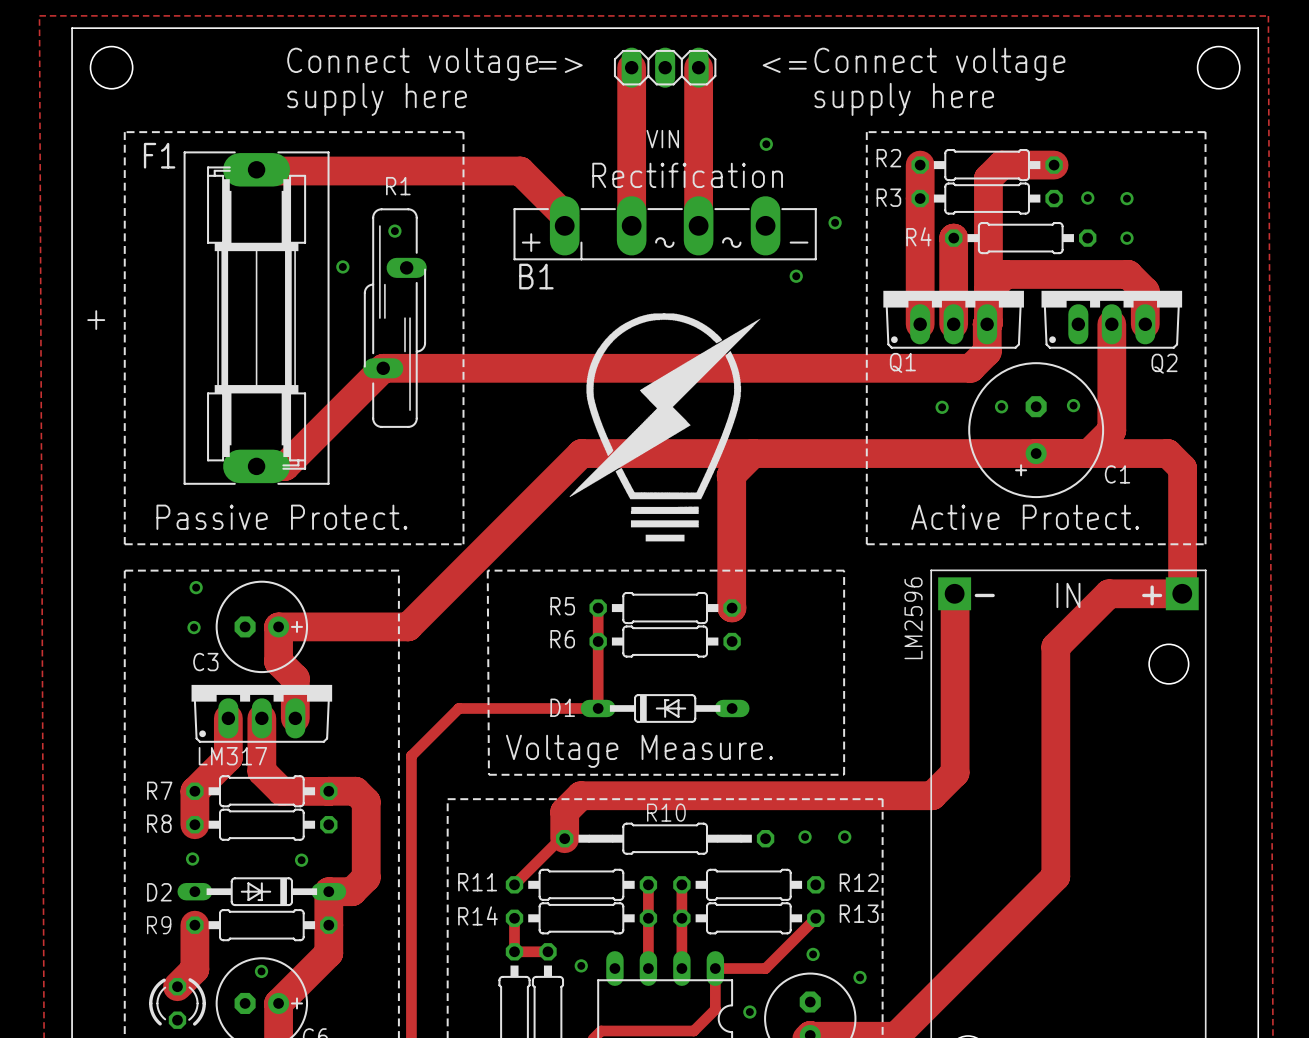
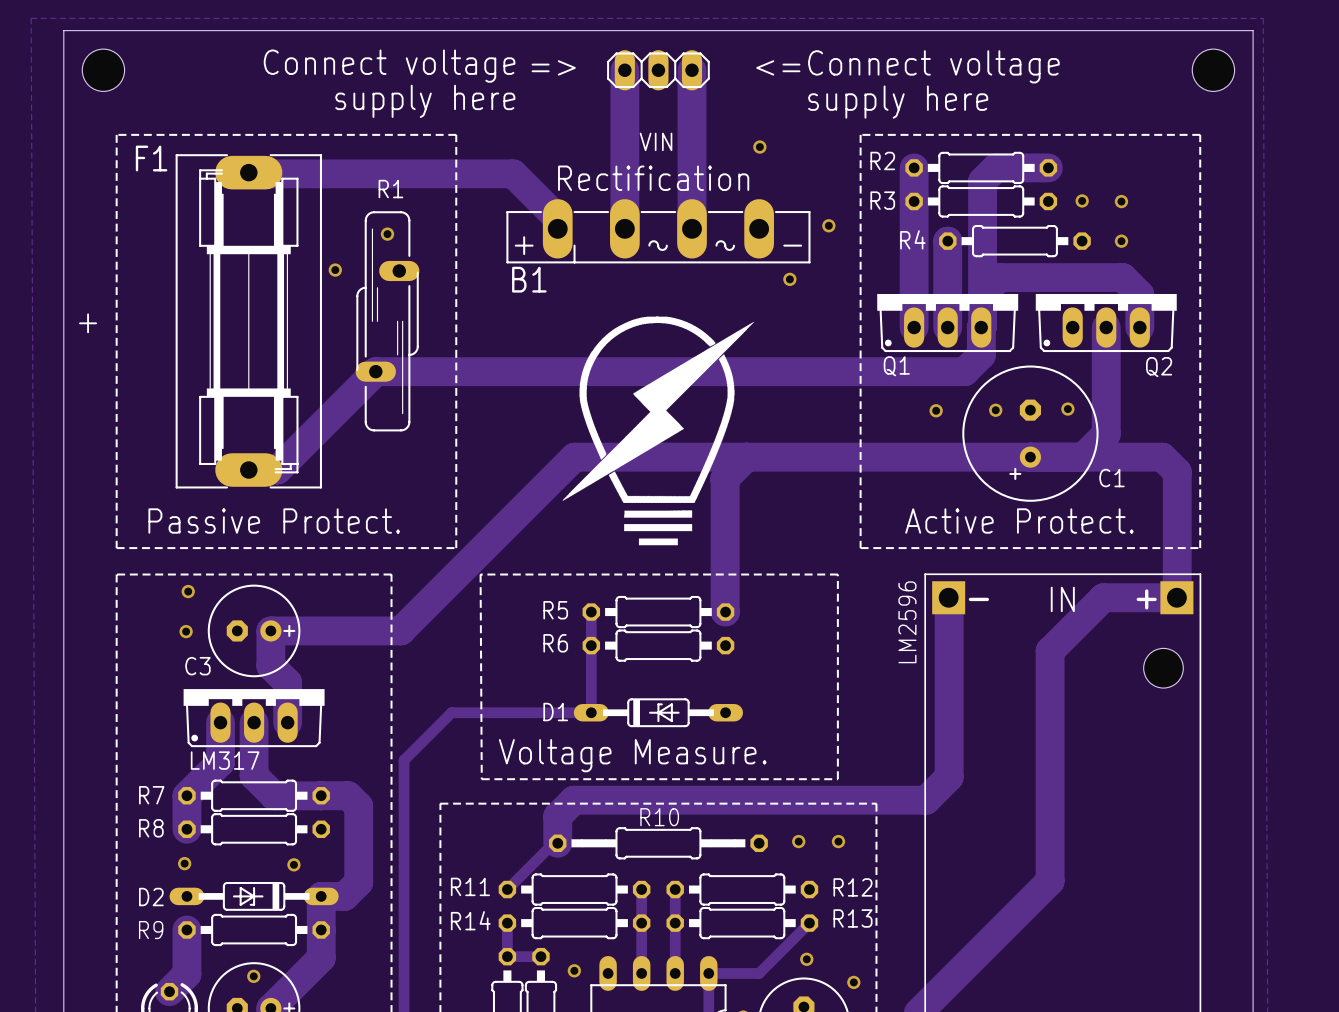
text position: Connect voltage (412, 64) -> Connect voltage (389, 66)
text position: supply here (377, 99) -> supply here (425, 101)
text position: Rectification (687, 175) -> Rectification (653, 178)

